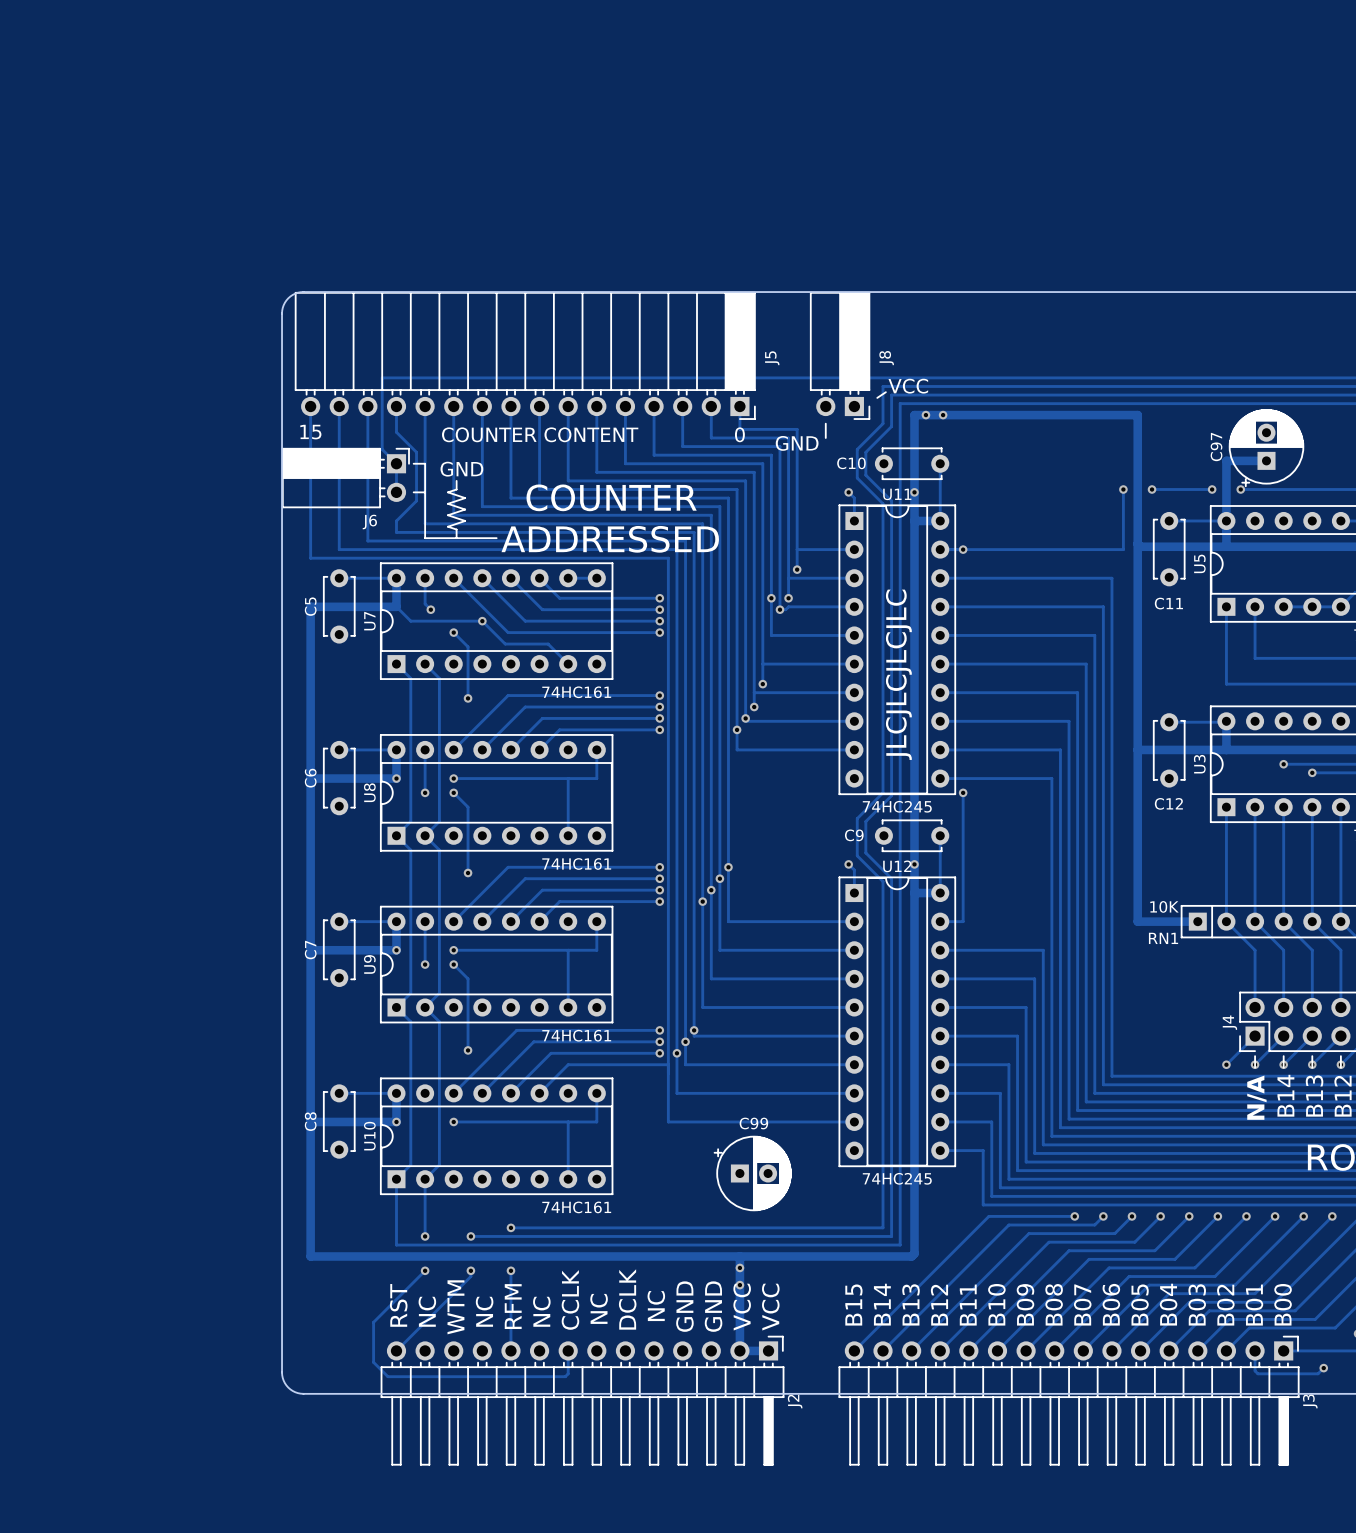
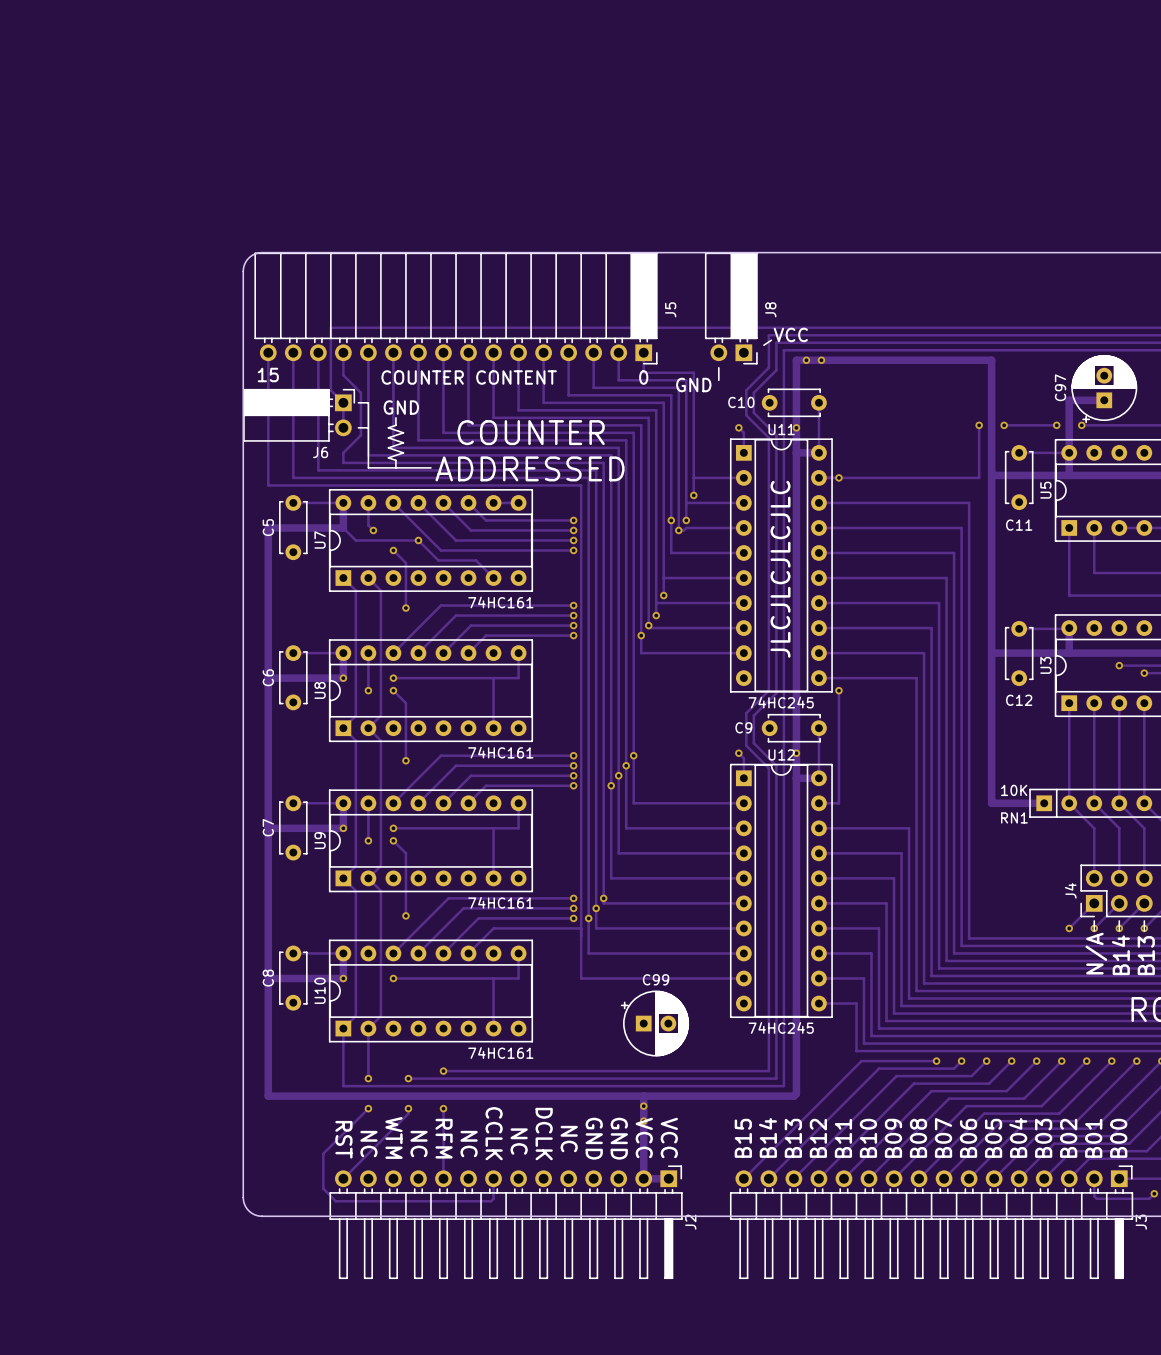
J2 footprint: [380, 1335, 785, 1466] -> [329, 1165, 683, 1279]

